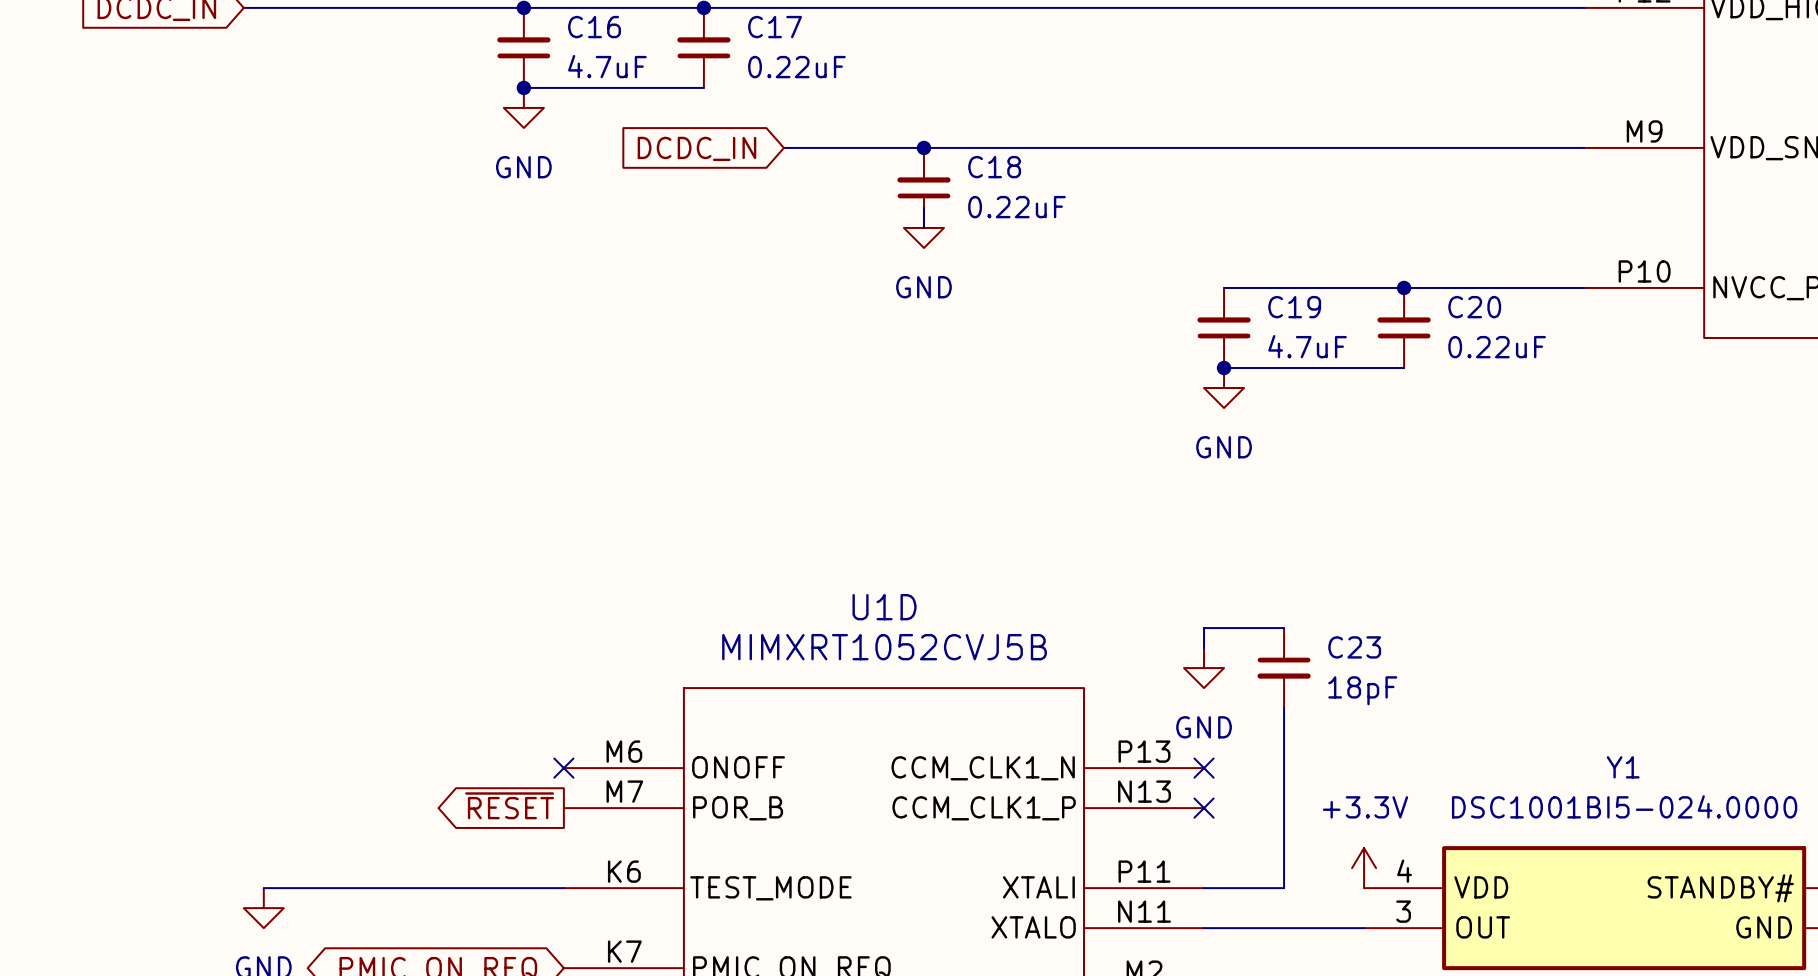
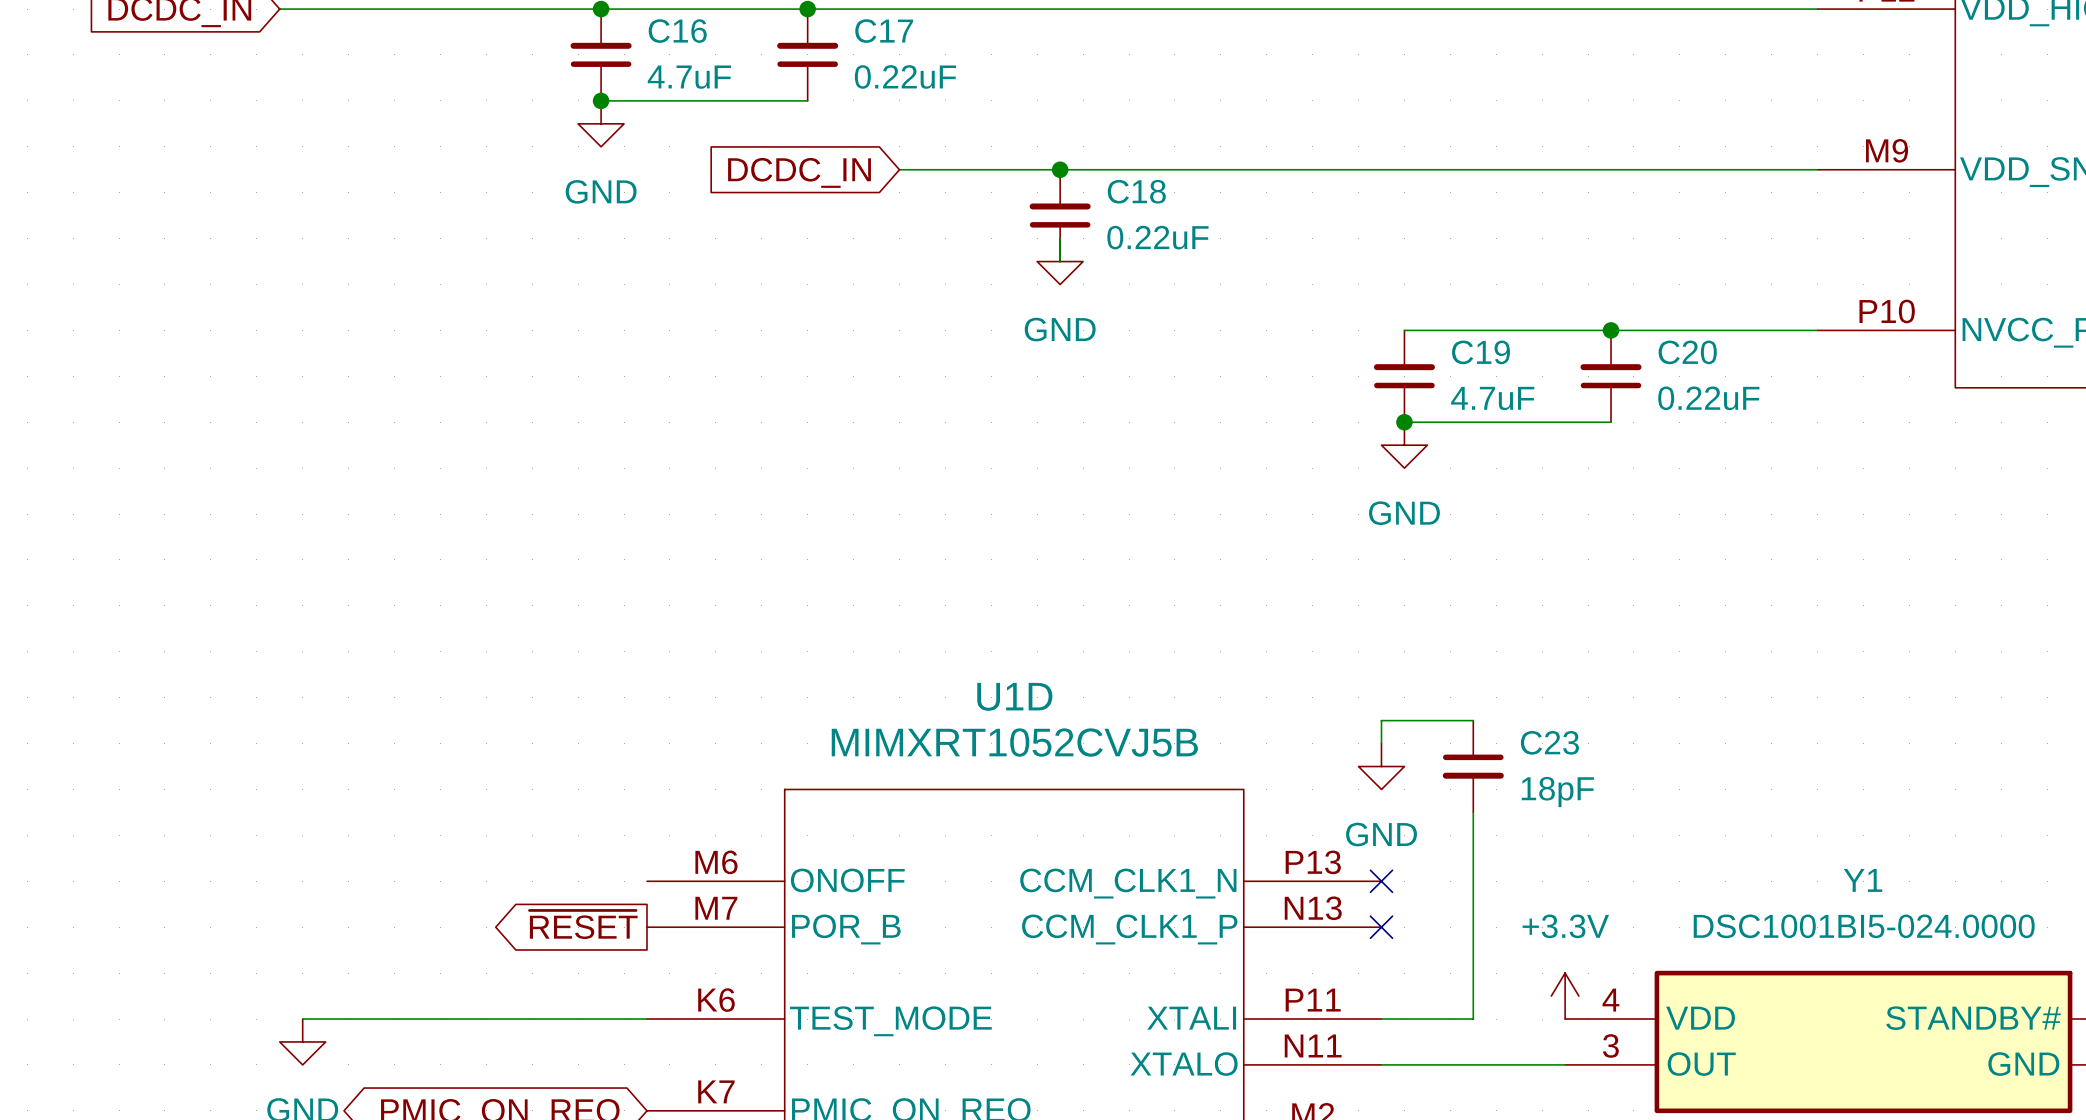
no-connect mark: (563, 768) -> none

